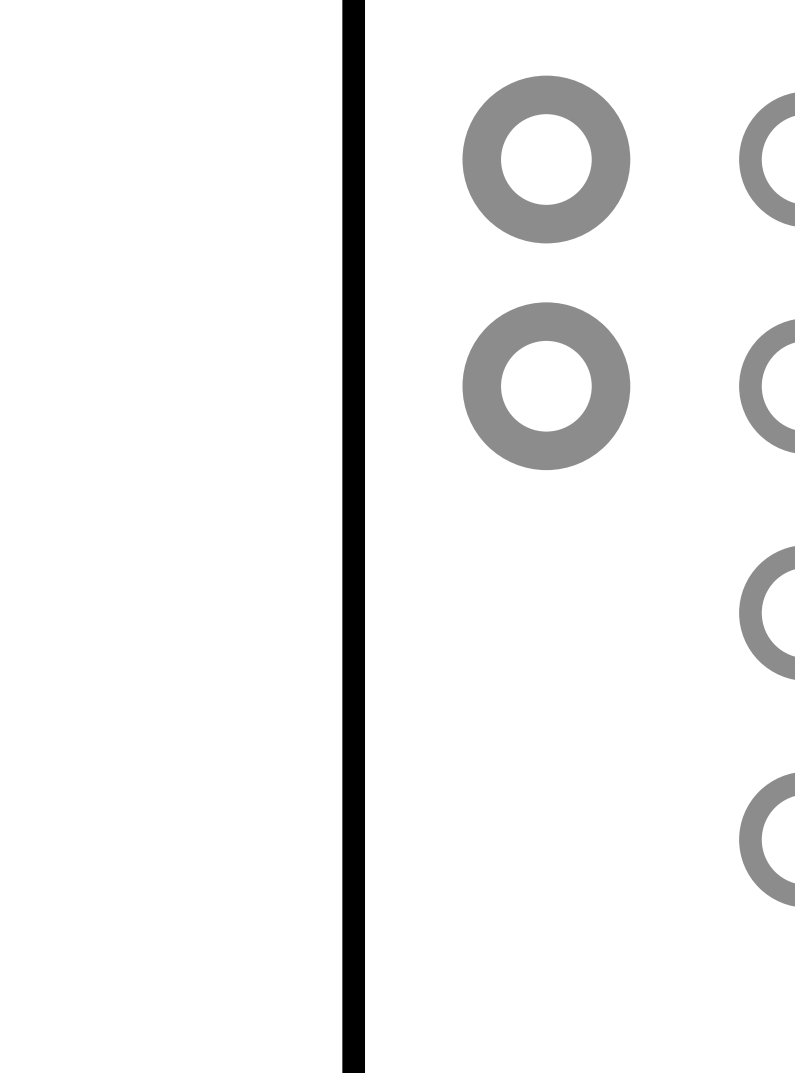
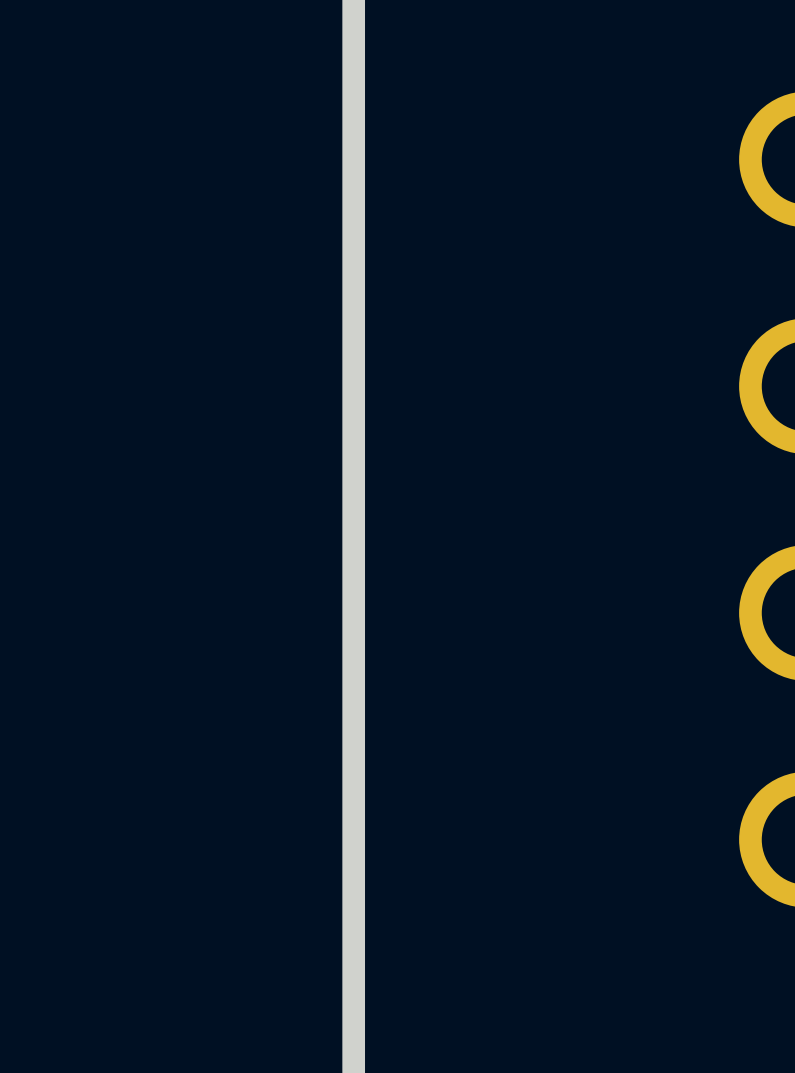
part: (546, 272) -> none

